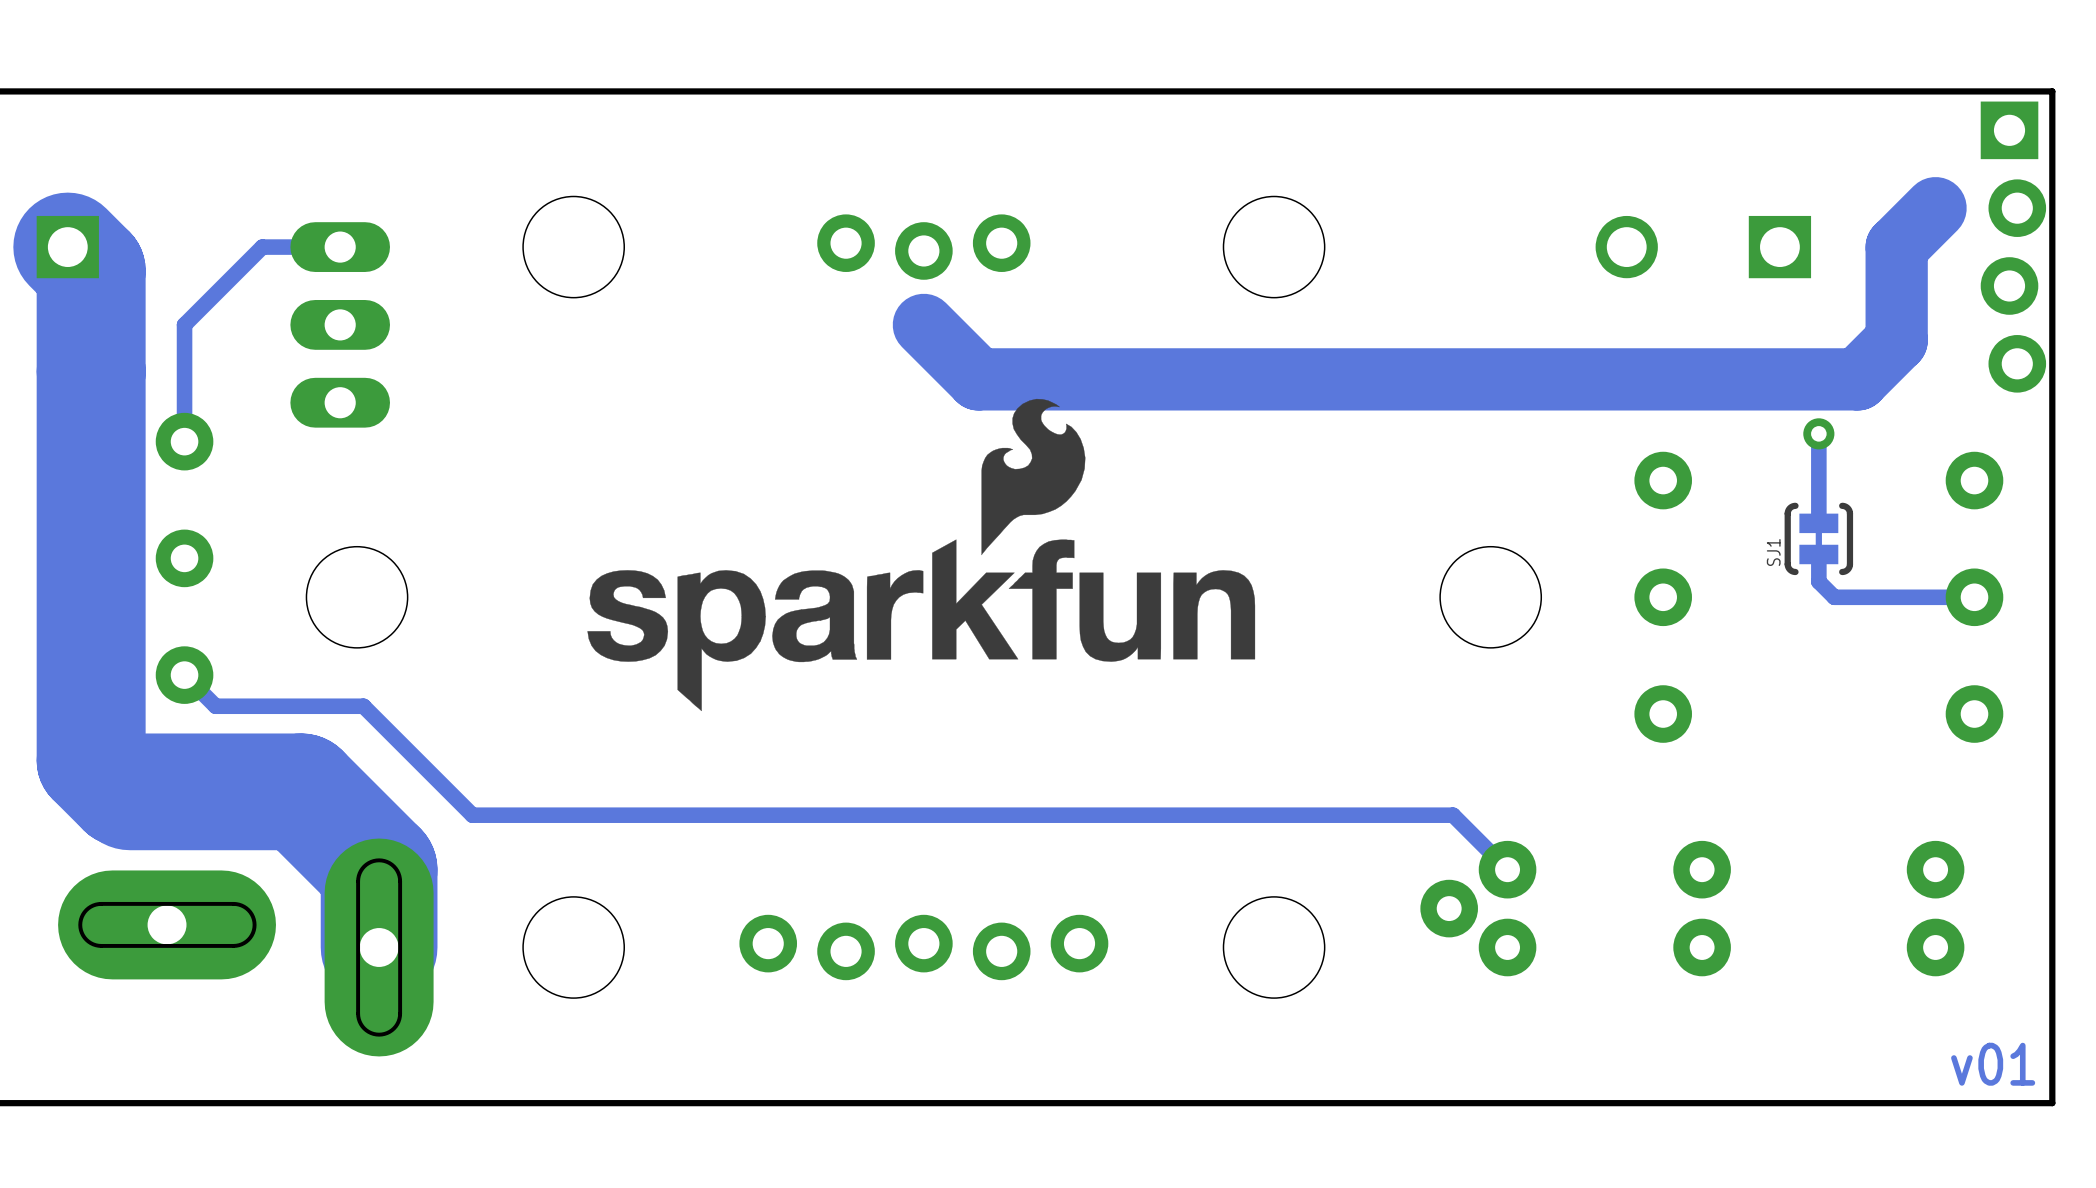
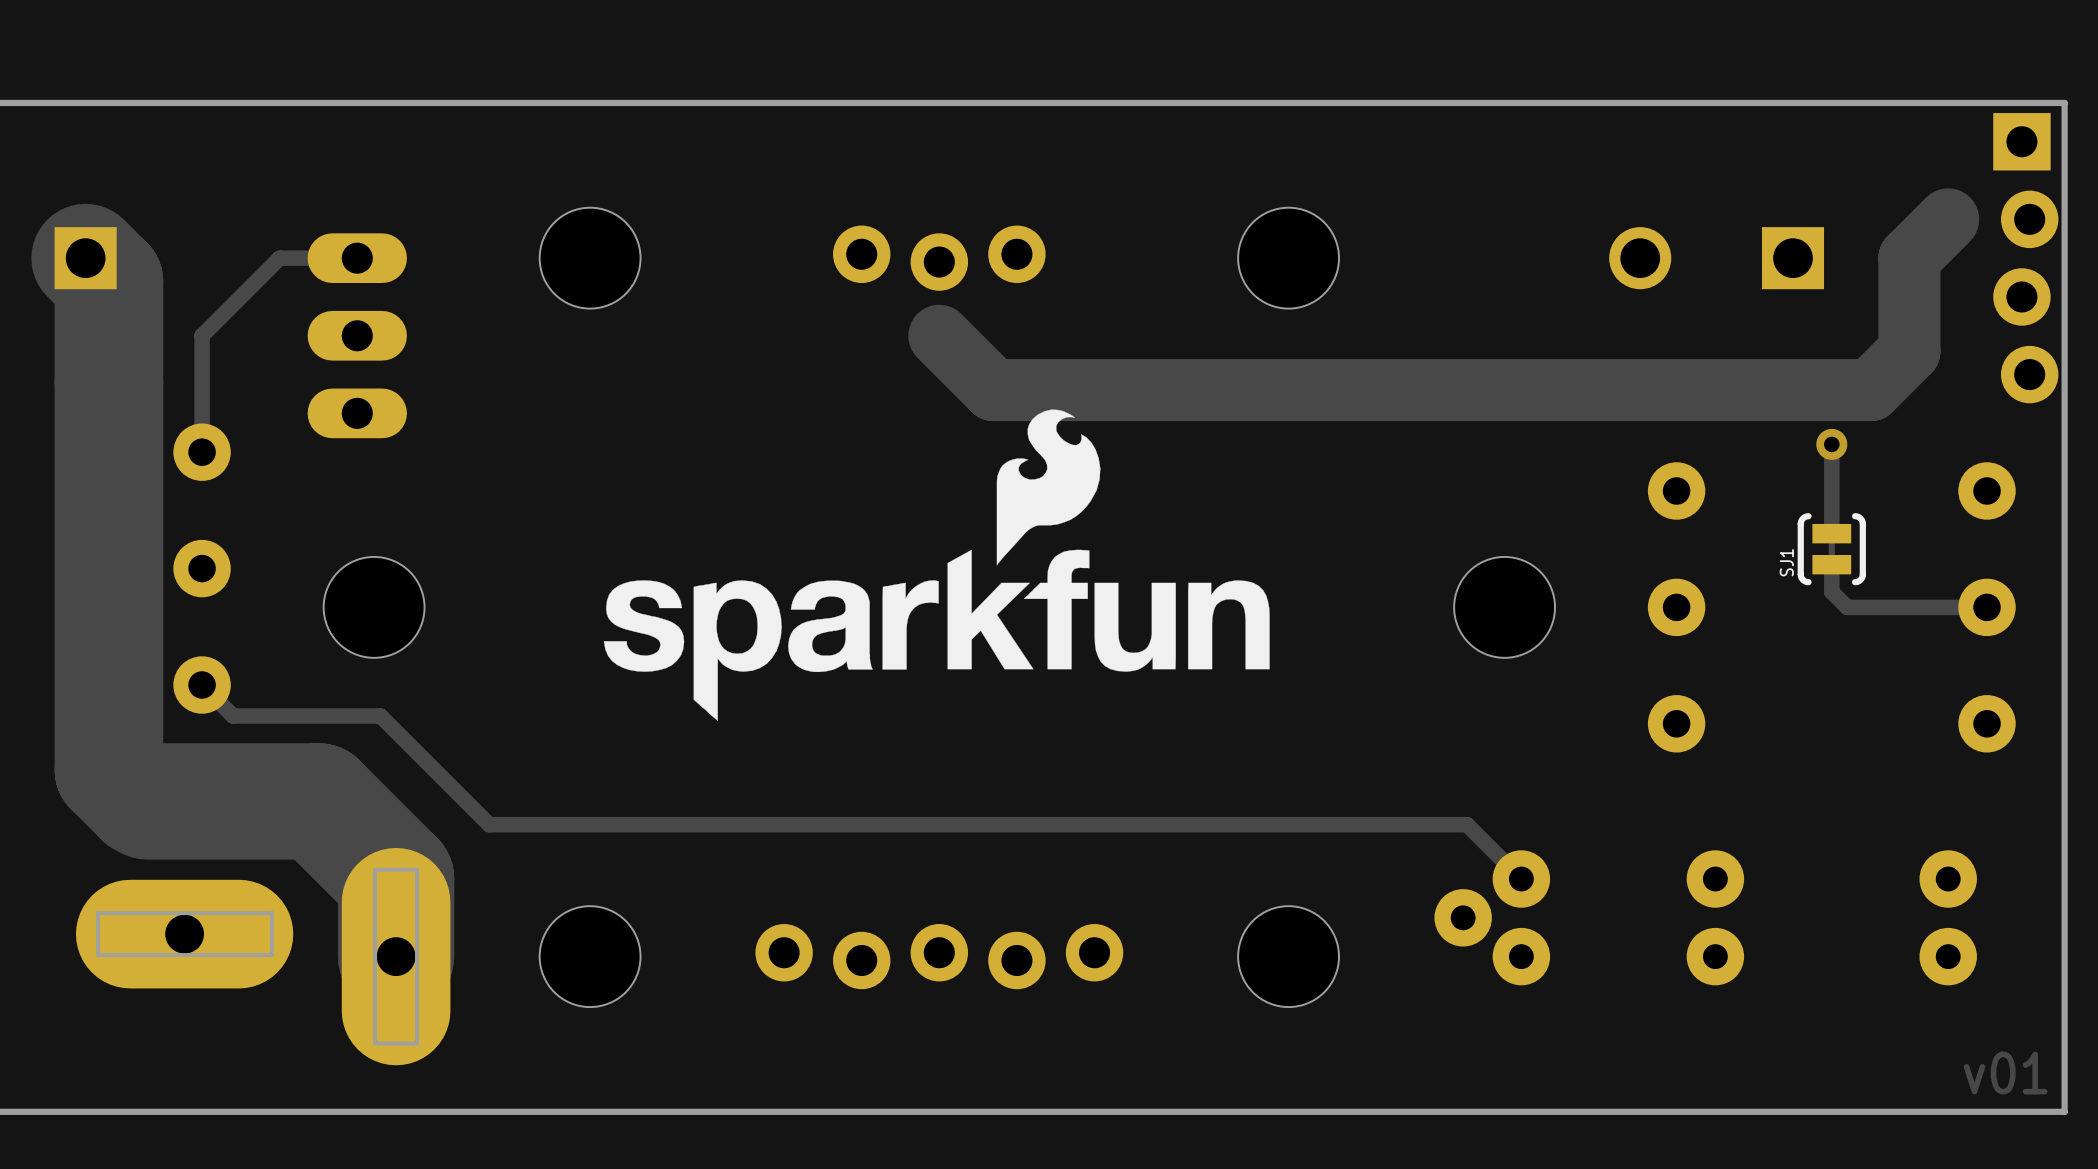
part footprint: [58, 838, 434, 1057] -> [75, 847, 451, 1066]

